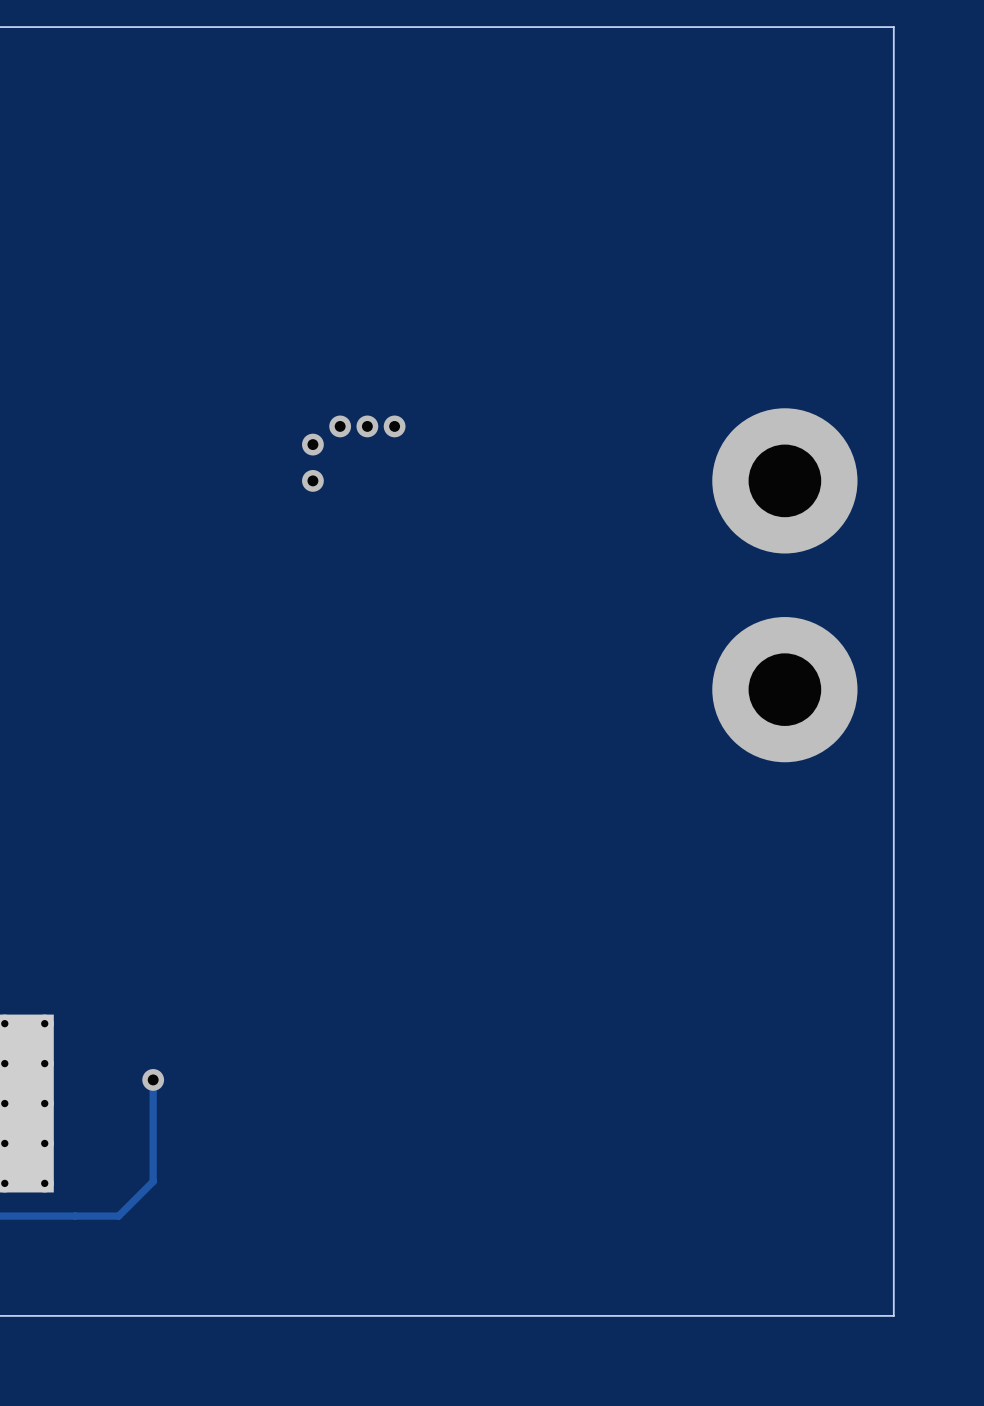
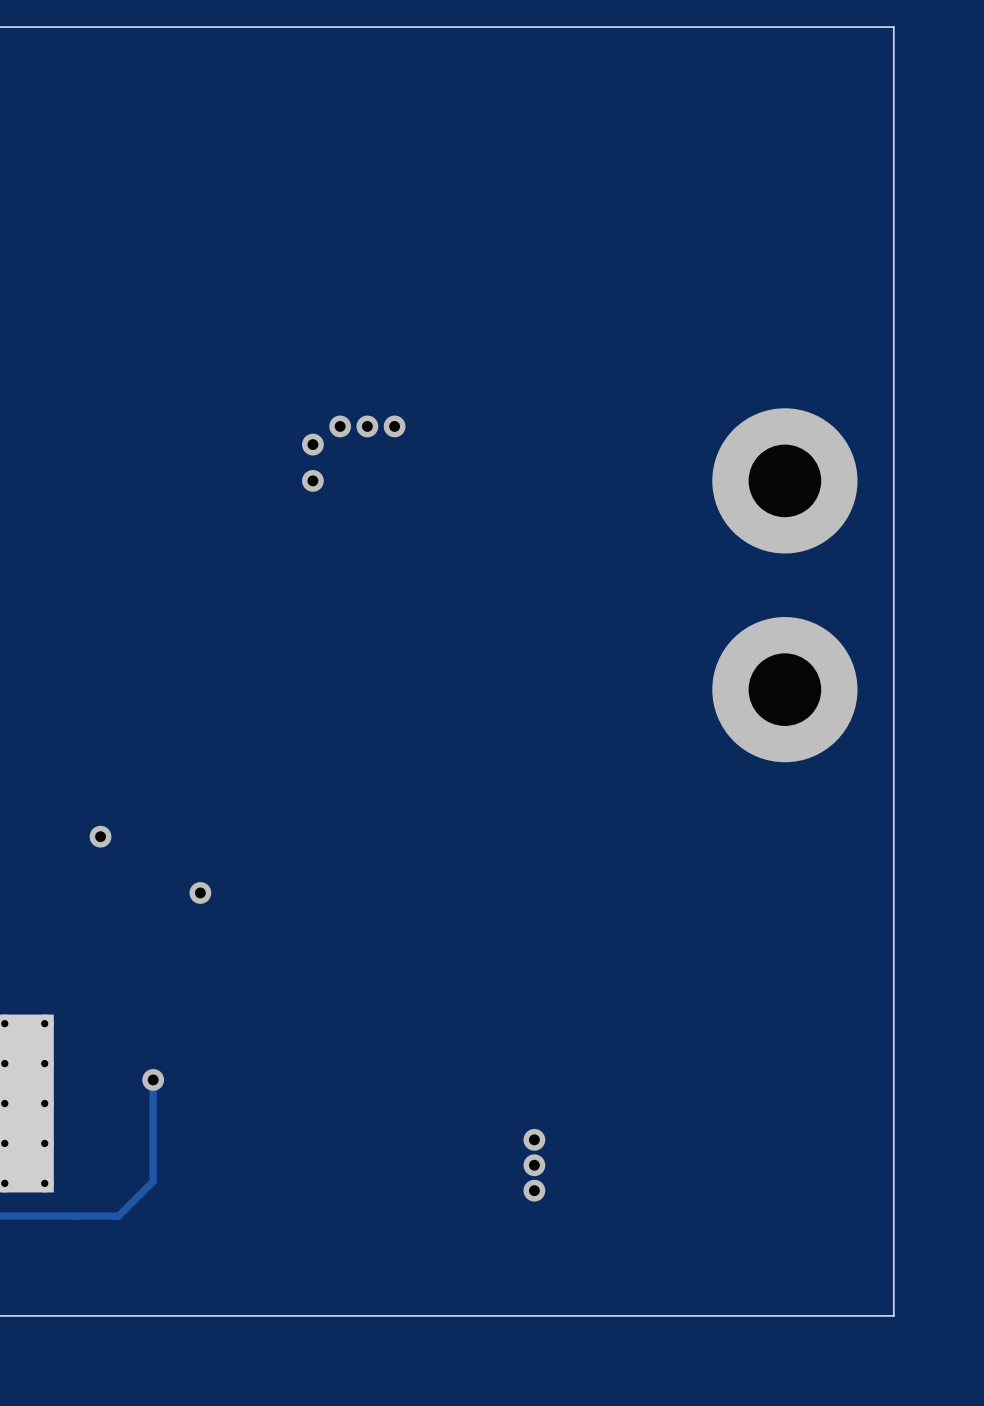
via: none -> (100, 836)
via: none -> (200, 892)
via: none -> (534, 1139)
via: none -> (534, 1165)
via: none -> (534, 1190)

